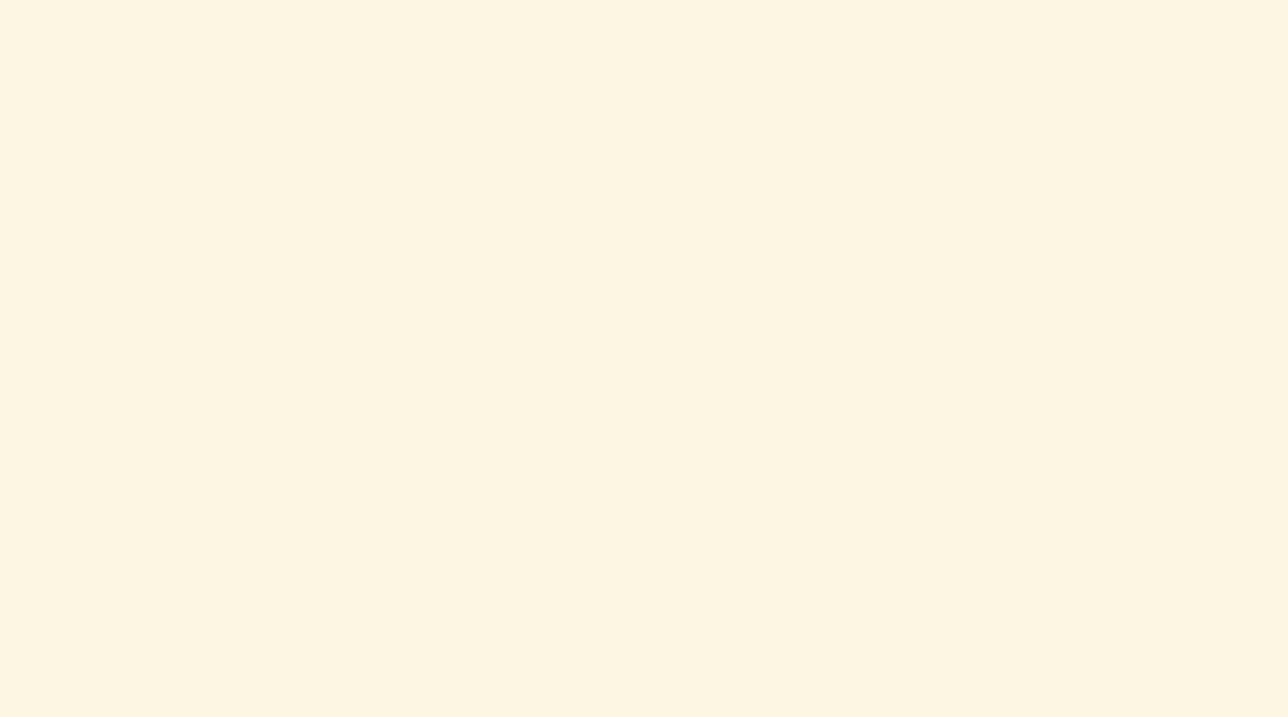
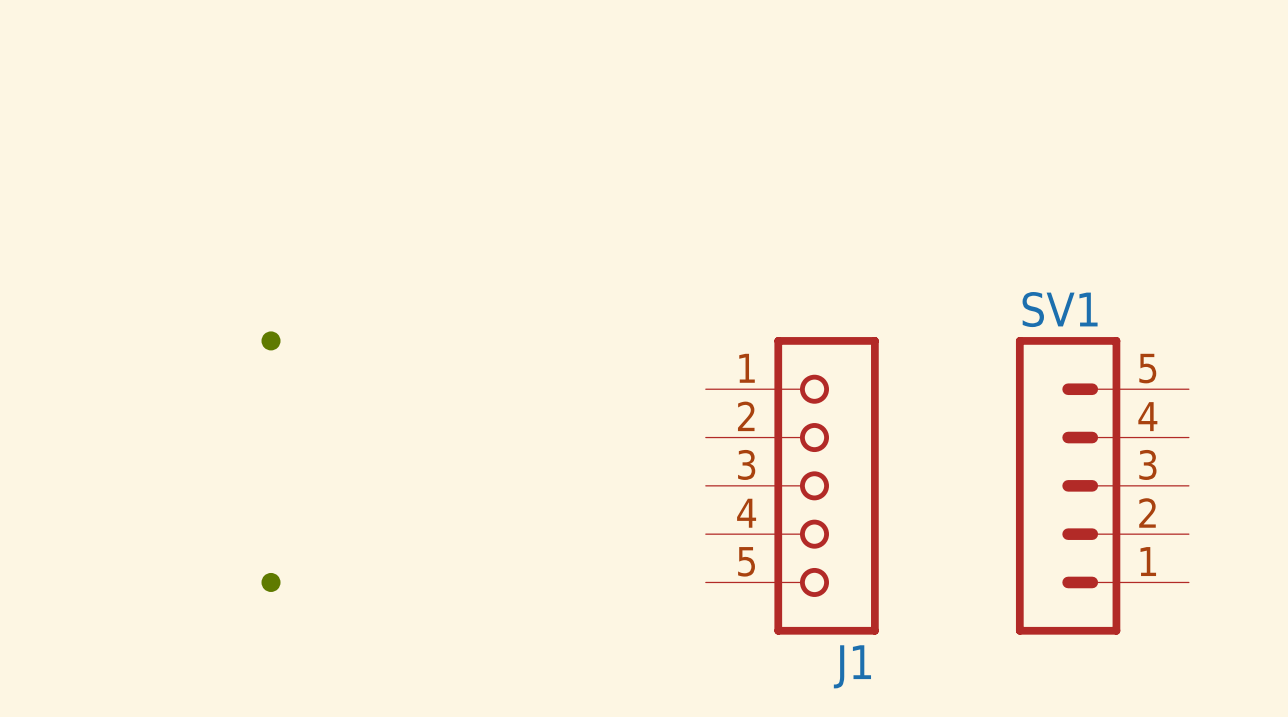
junction: none -> (271, 340)
J1: none -> (792, 485)
SV1: none -> (1102, 485)
junction: none -> (271, 582)

